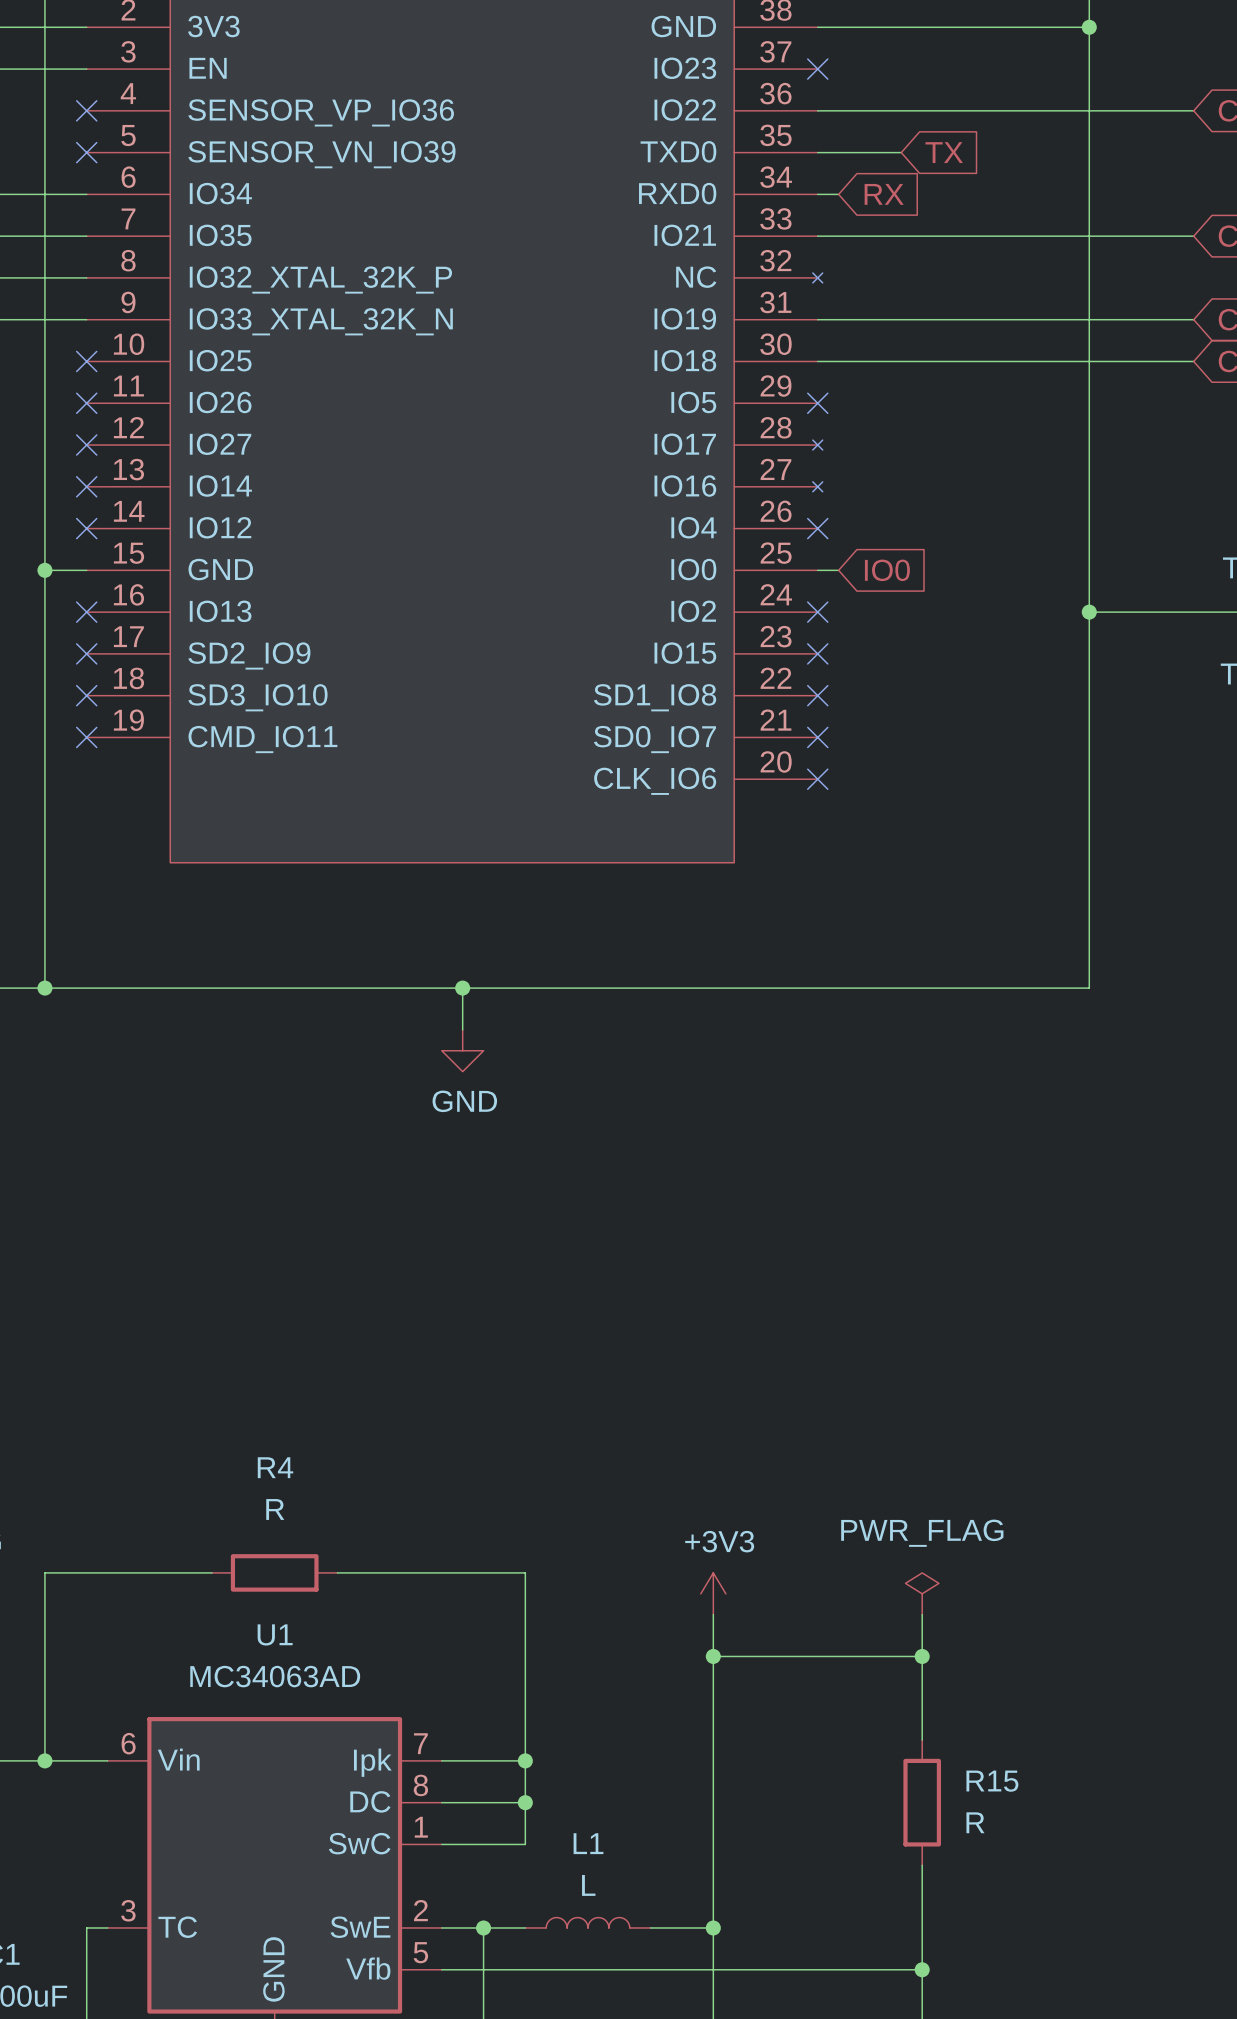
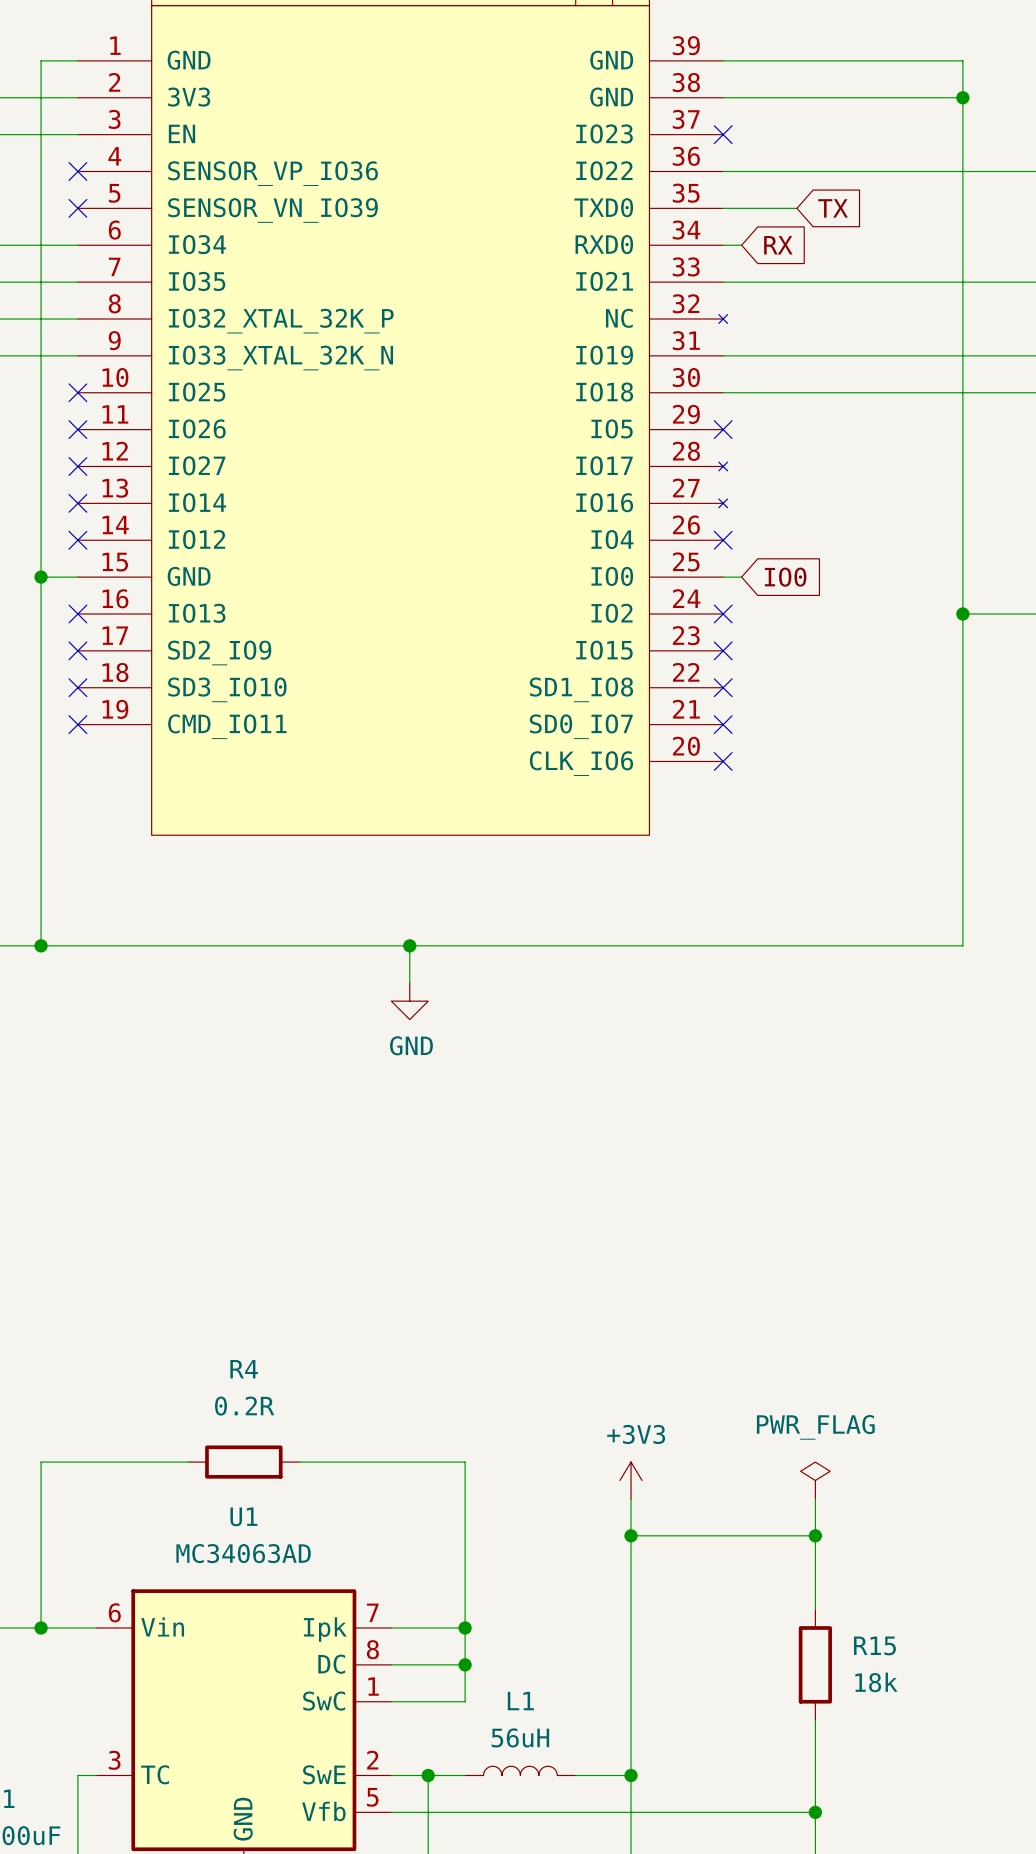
R4 value: R (275, 1509) -> 0.2R (244, 1406)
R15 value: R (975, 1822) -> 18k (876, 1682)
L1 value: L (588, 1885) -> 56uH (520, 1737)

